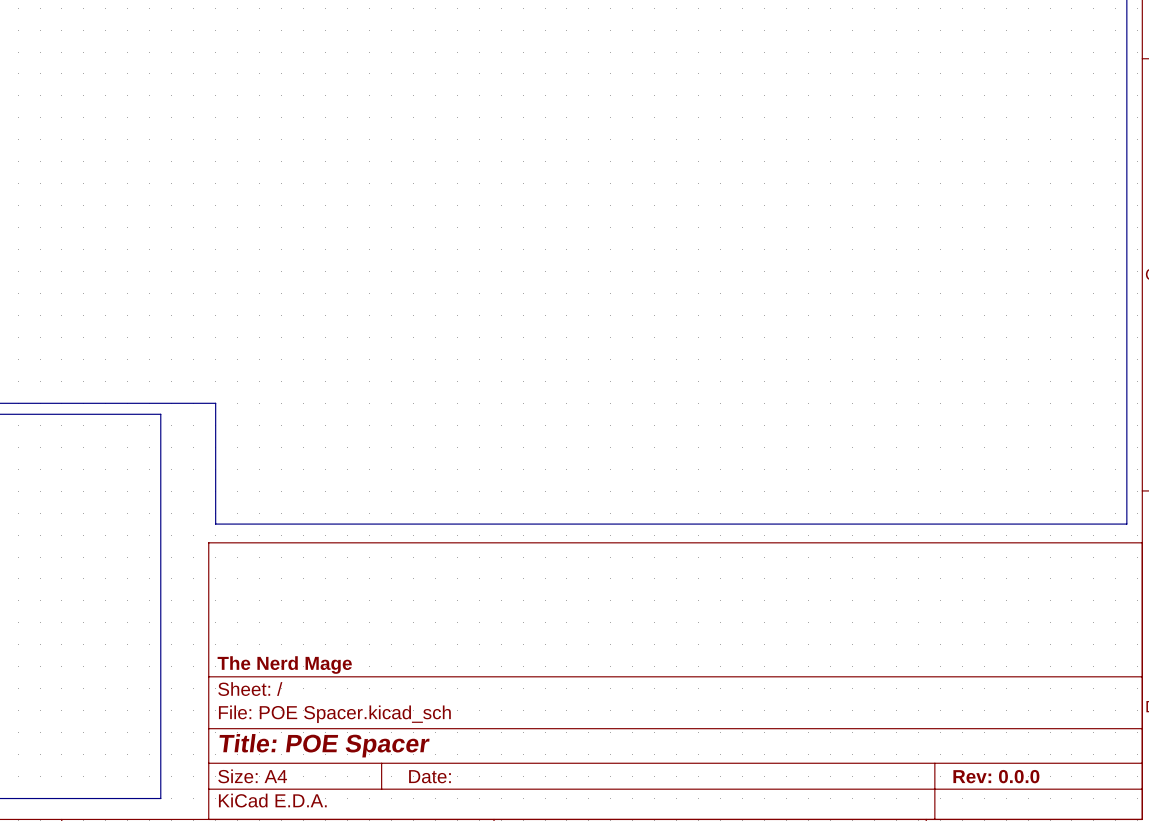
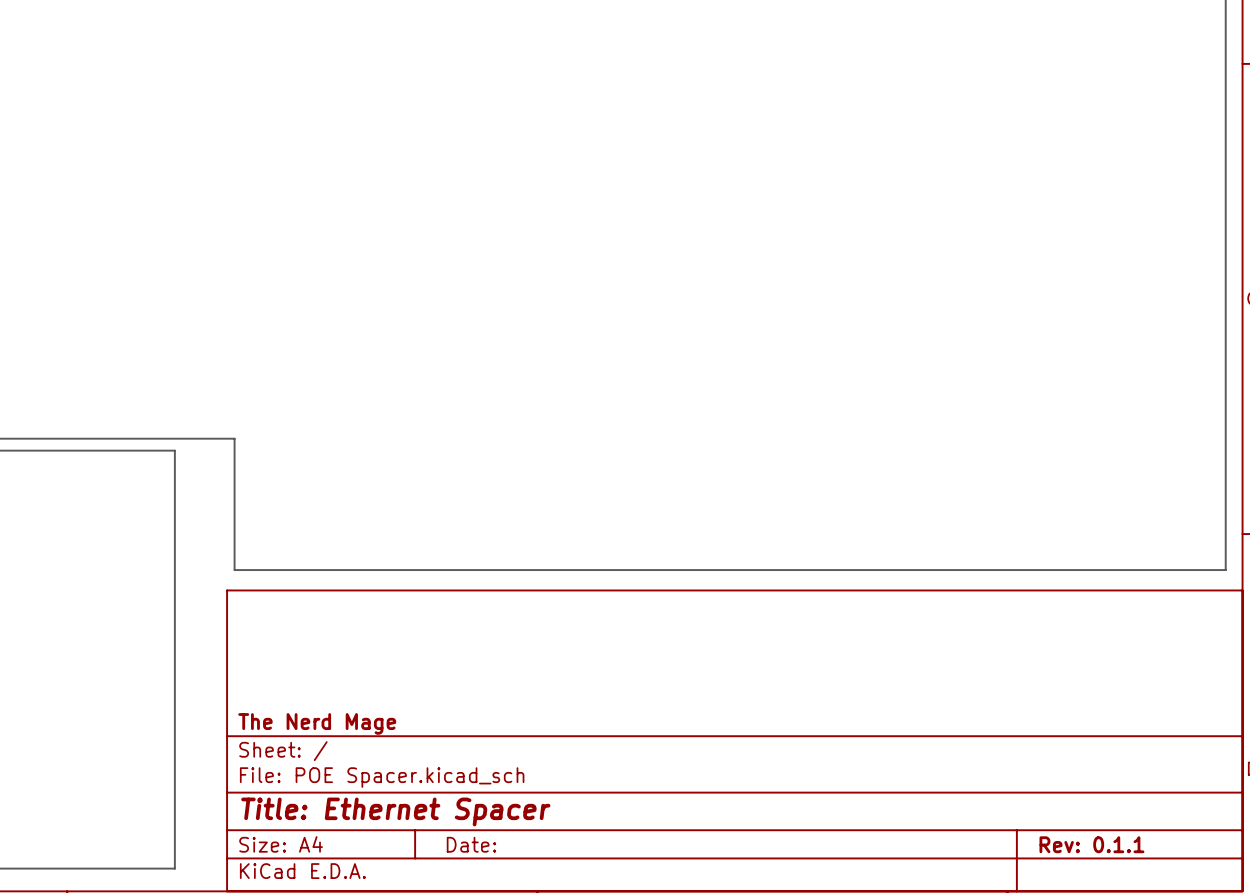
title block: Title: POE Spacer (324, 745) -> Title: Ethernet Spacer (395, 811)
title block: Rev: 0.0.0 (996, 776) -> Rev: 0.1.1 (1091, 844)

